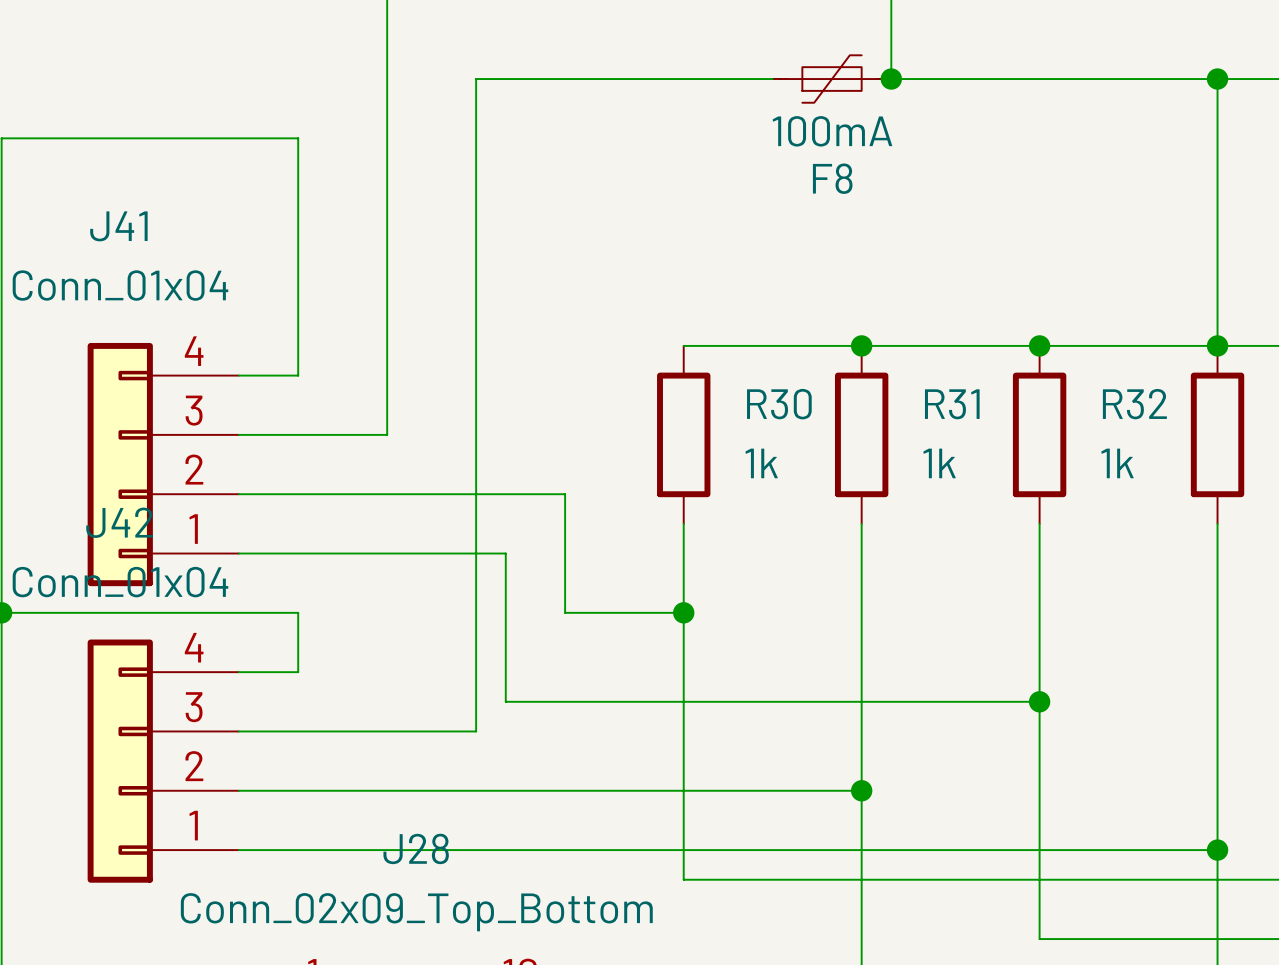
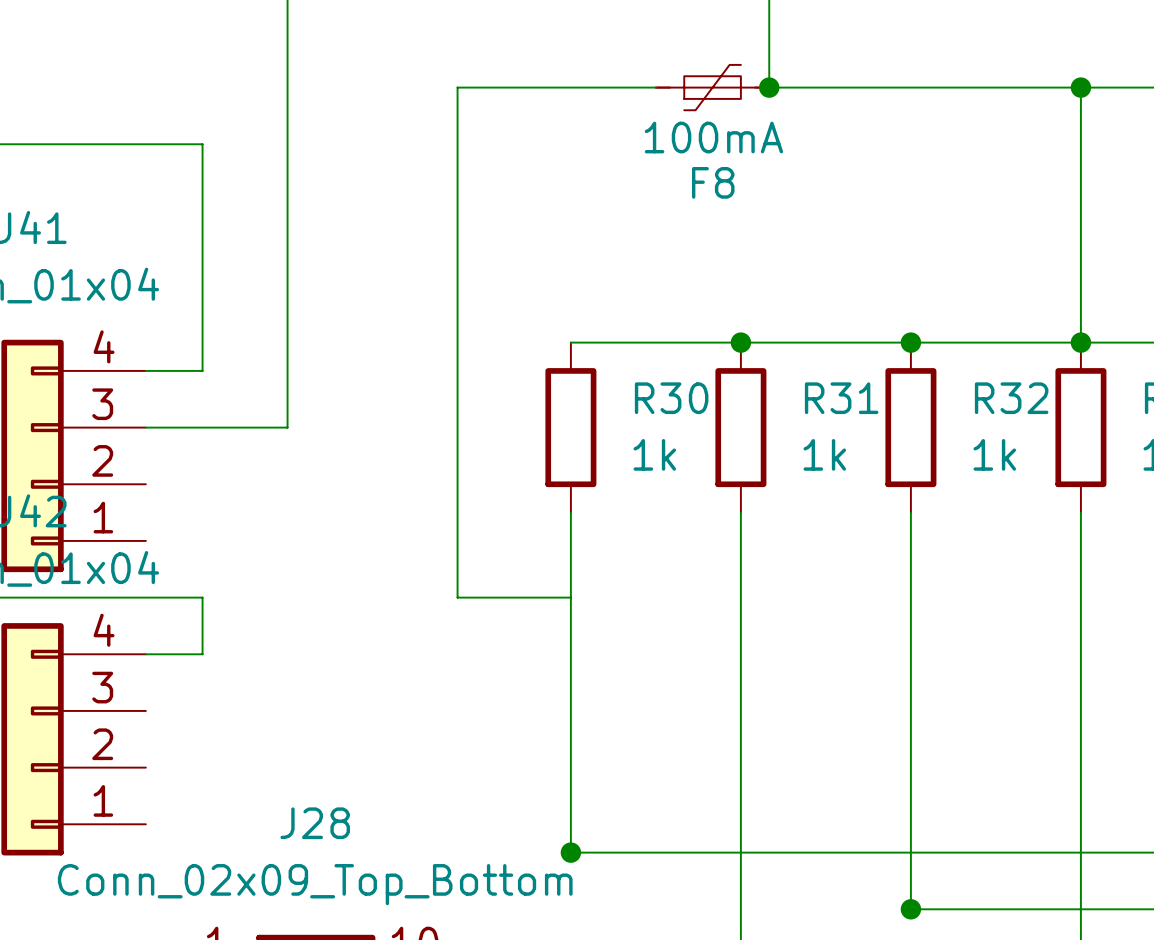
wire: (565, 79) (476, 79) (476, 731) (238, 731) -> (457, 87) (457, 484)
wire: (238, 494) (565, 494) -> none
wire: (238, 553) (505, 553) (505, 701) (1039, 701) -> none
junction: (683, 612) -> none
junction: (1039, 701) -> none
wire: (238, 790) (861, 790) -> none
junction: (861, 790) -> none
wire: (238, 850) (1217, 850) -> none
junction: (1217, 850) -> none
junction: none -> (570, 852)
junction: none -> (910, 909)

